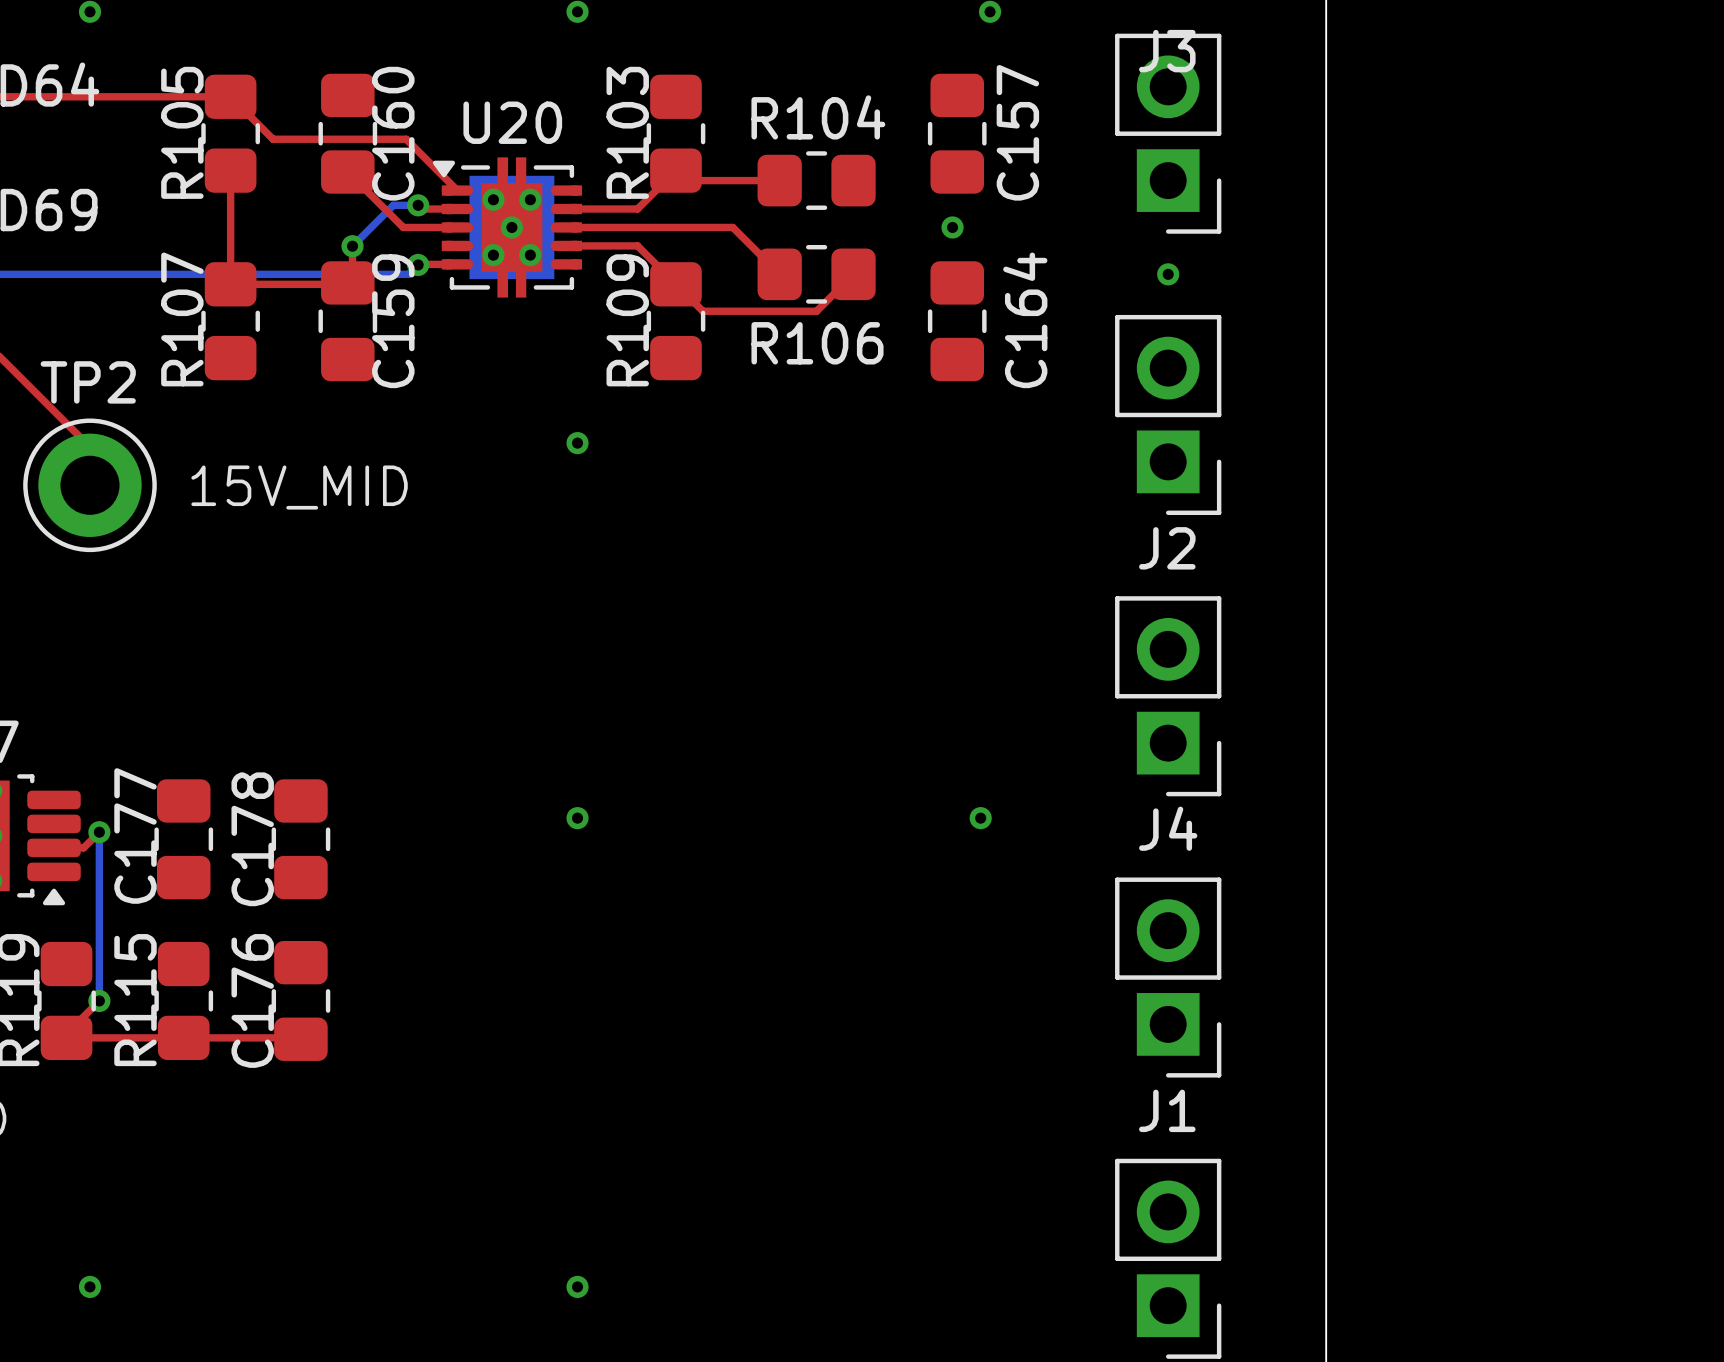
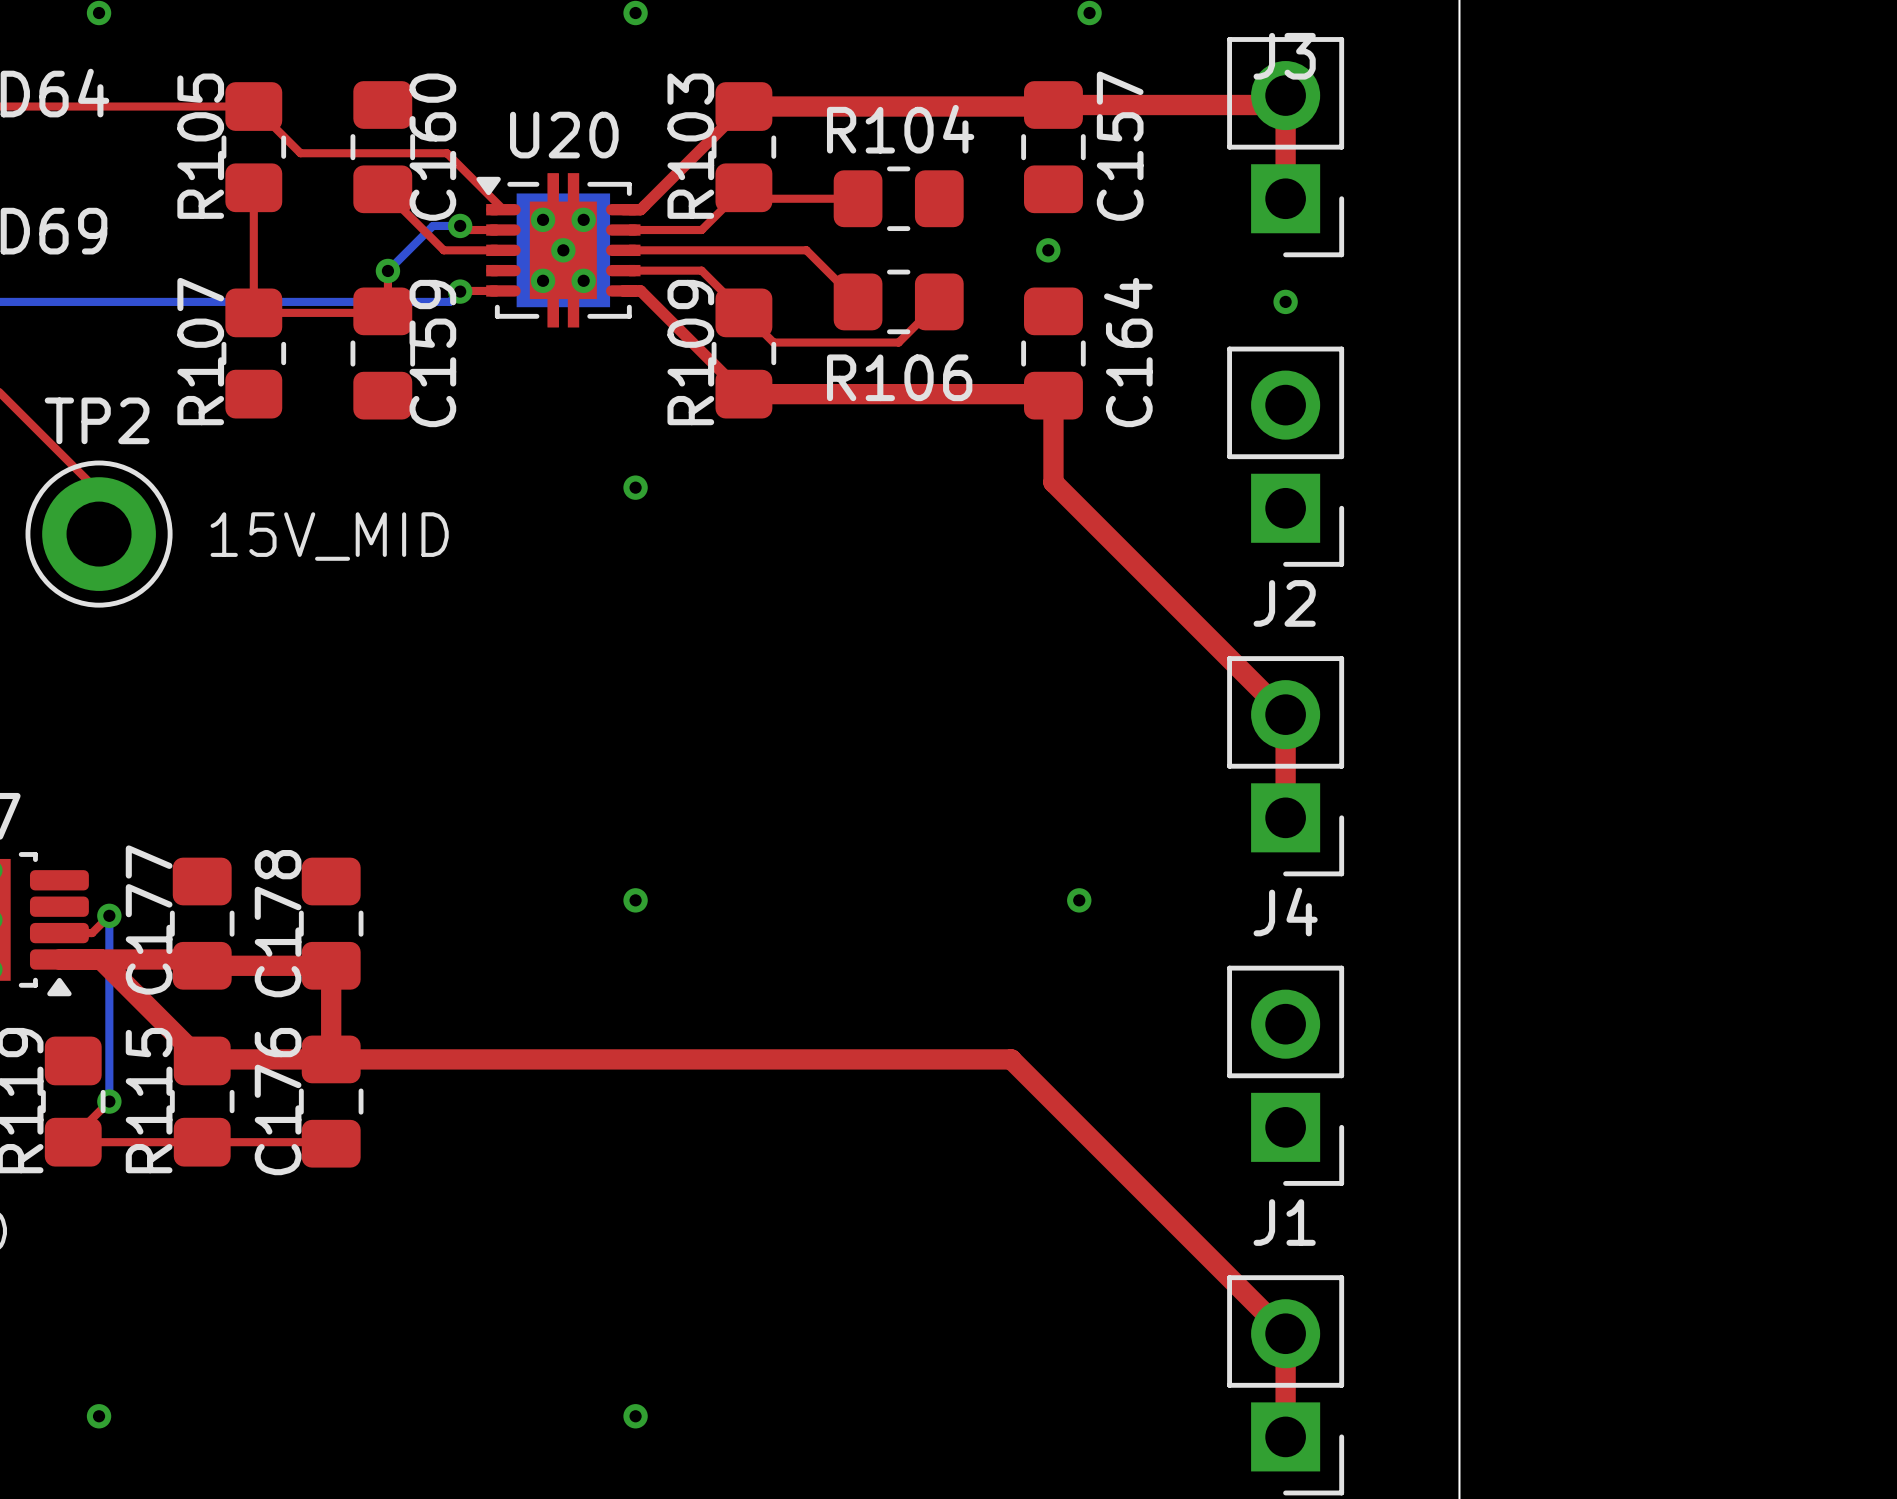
top track: none -> (1285, 198) (1285, 95) (1276, 105) (743, 106) (640, 209) (623, 209)
top track: none -> (623, 290) (640, 290) (743, 394) (1051, 394) (1053, 482) (1285, 714) (1285, 817)
top track: none -> (59, 959) (195, 959) (202, 965) (331, 965) (331, 1059)
top track: none -> (100, 959) (202, 1060) (203, 1059) (1011, 1059) (1285, 1333) (1285, 1436)

